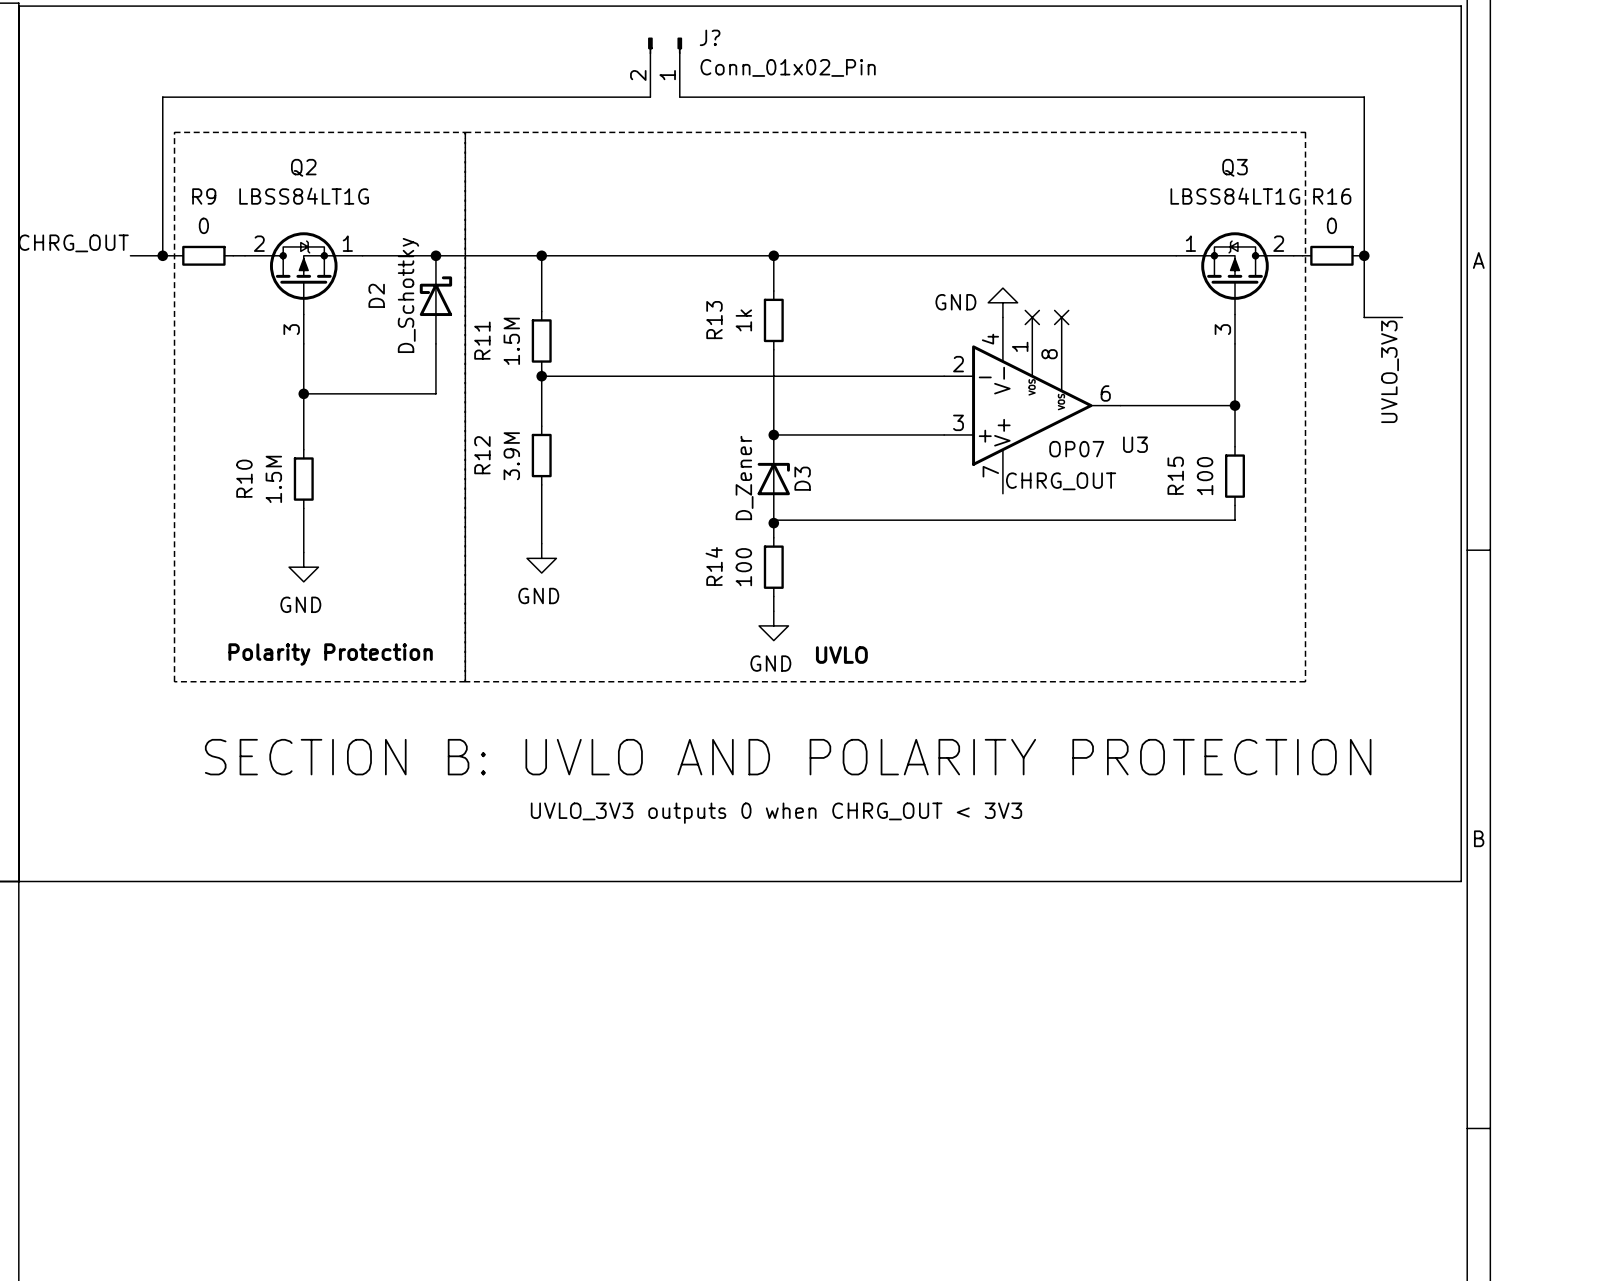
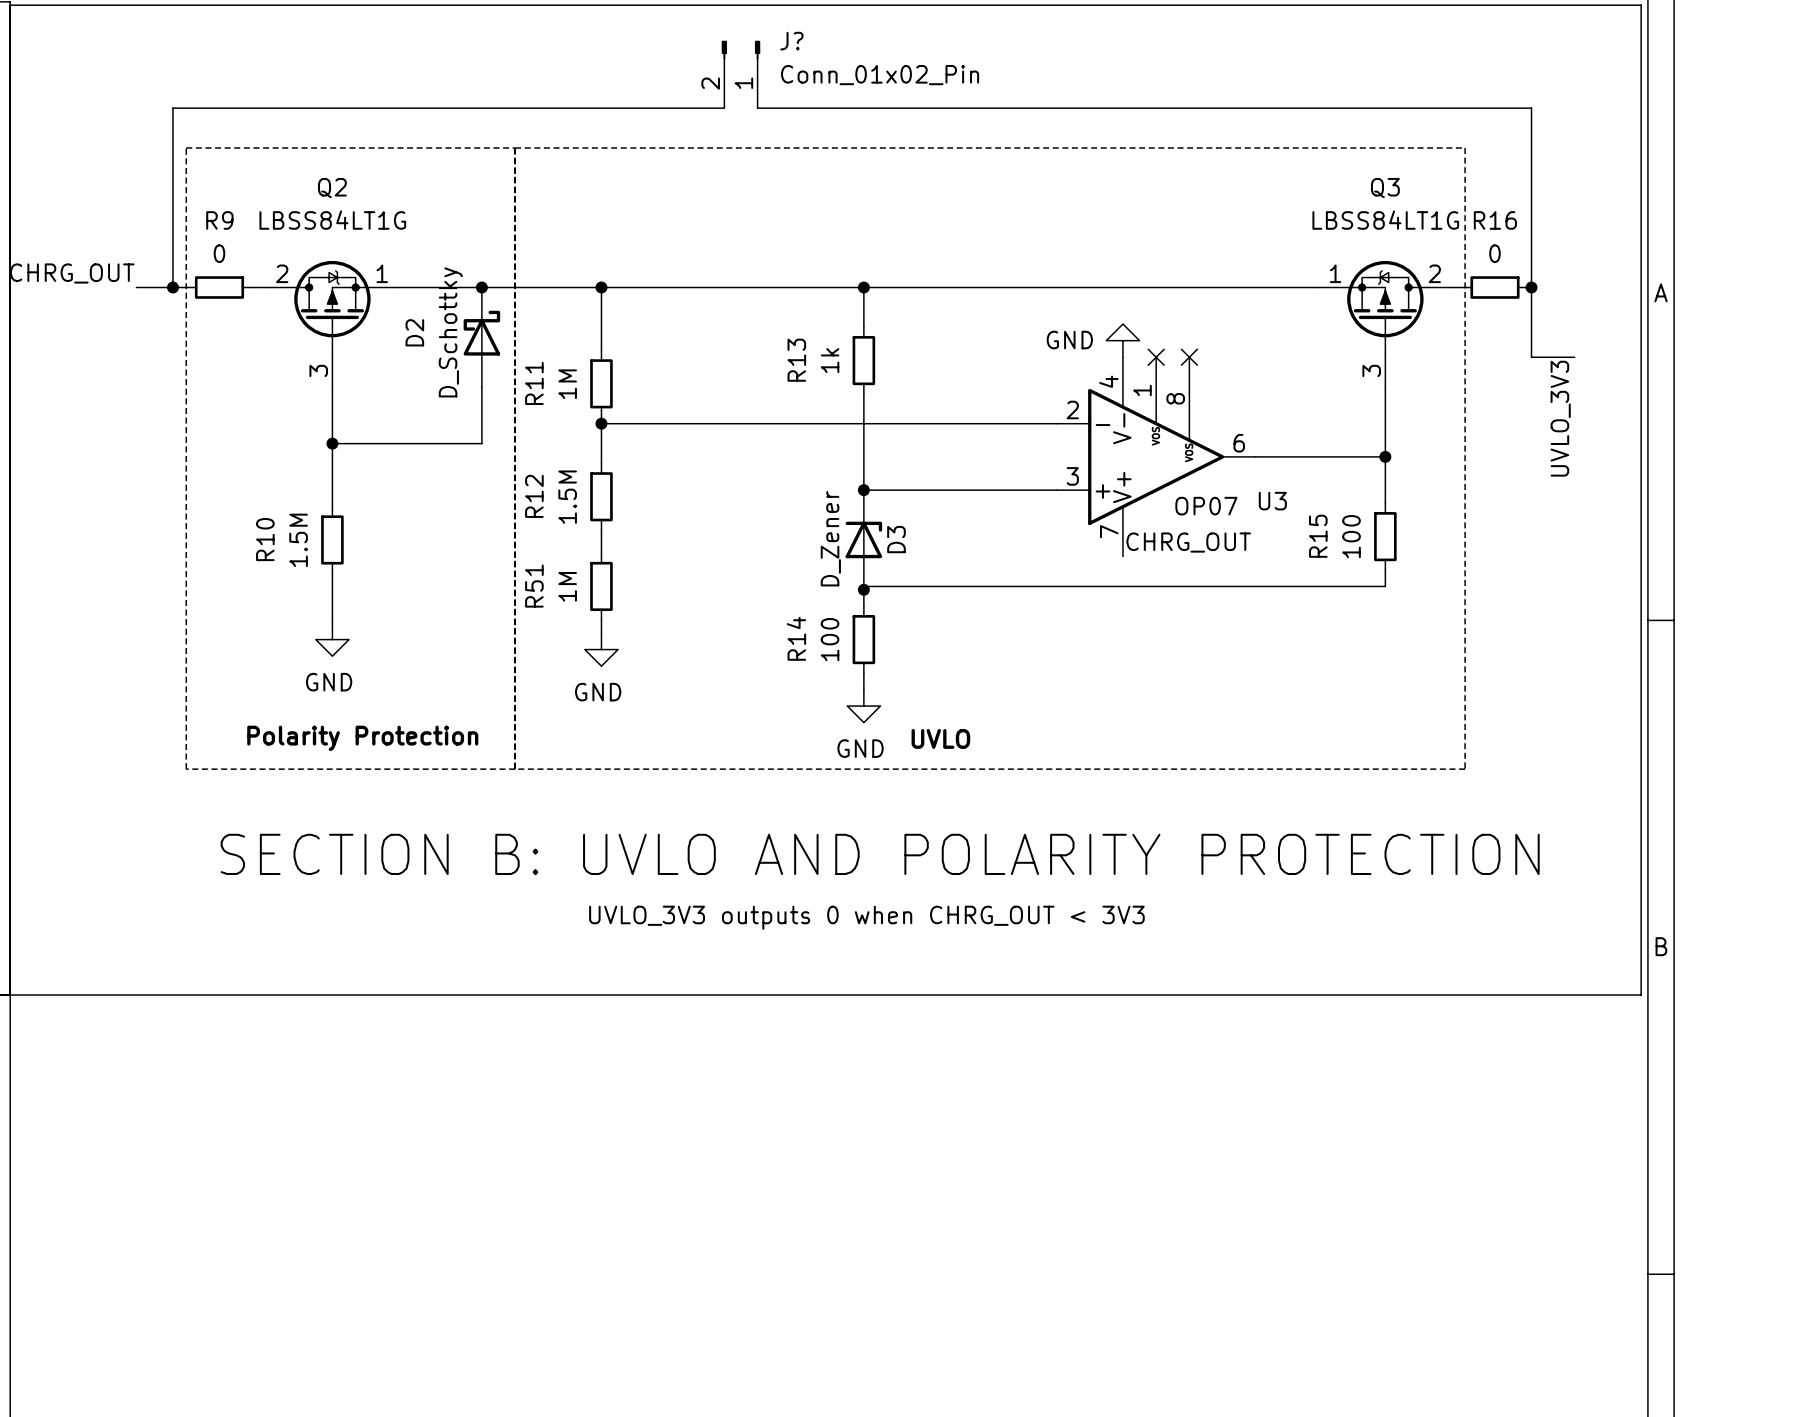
R11 value: 1.5M (511, 341) -> 1M (567, 384)
R12 position: (541, 455) -> (601, 496)
R12 value: 3.9M (511, 456) -> 1.5M (567, 497)
wire: (541, 490) (541, 543) -> none
R51: none -> 1M (601, 586)
power symbol position: GND (541, 558) -> GND (601, 649)

